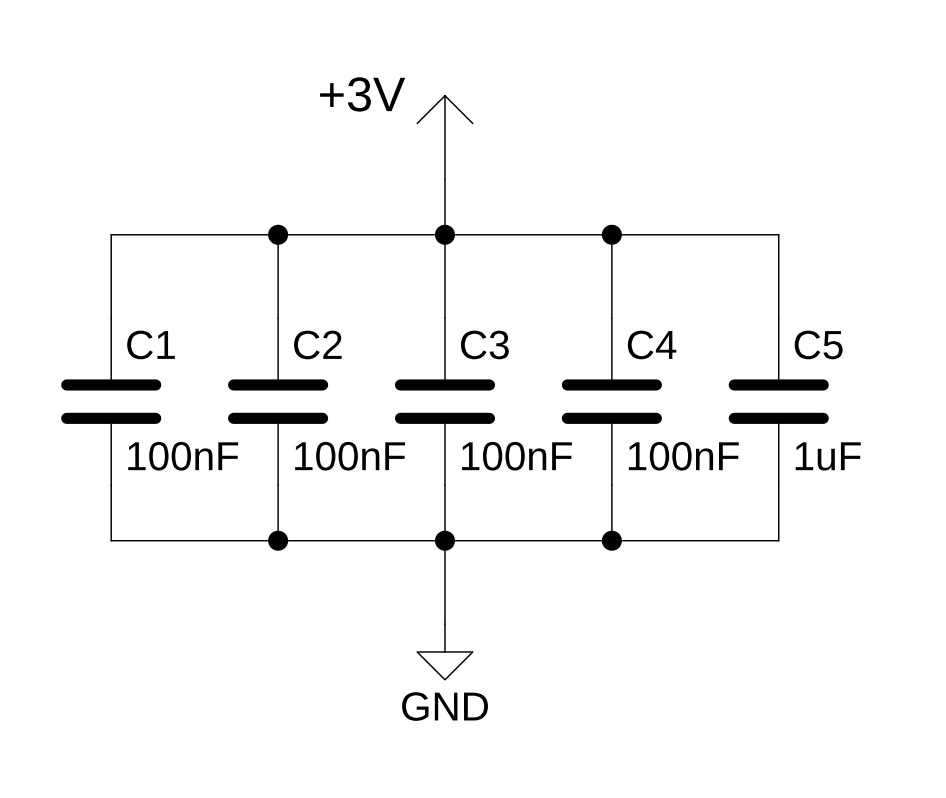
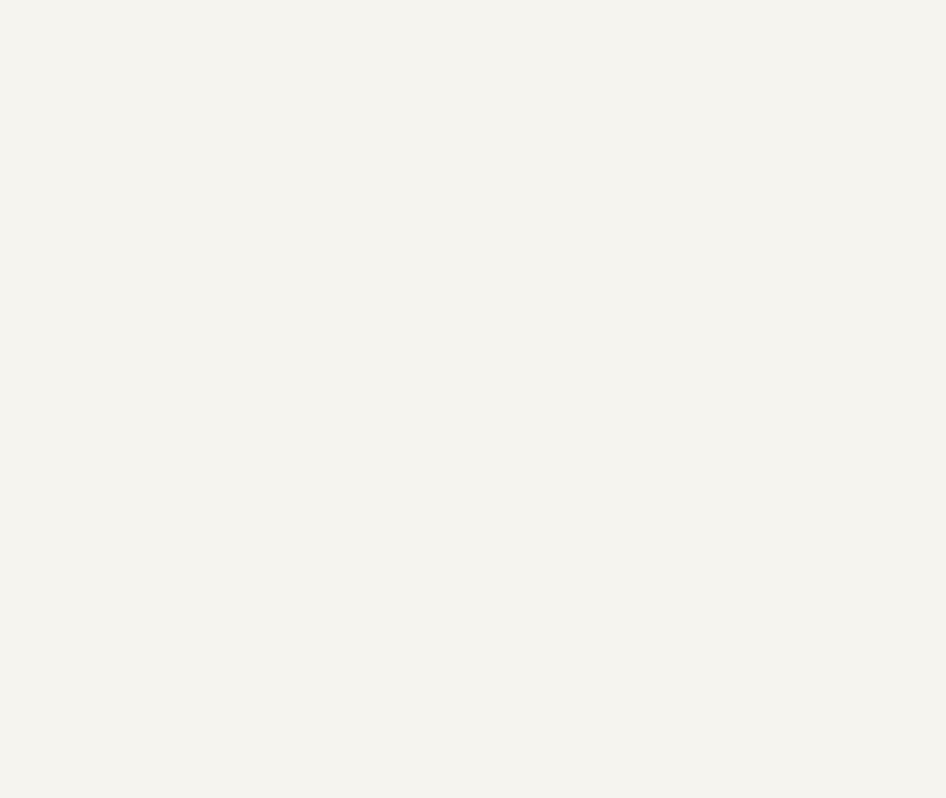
power symbol: +3V (444, 137) -> none
wire: (444, 179) (444, 318) -> none
wire: (278, 234) (278, 318) -> none
junction: (278, 234) -> none
junction: (444, 234) -> none
wire: (611, 234) (611, 318) -> none
junction: (611, 234) -> none
wire: (111, 318) (111, 234) (778, 234) (778, 318) -> none
C1: 100nF (111, 401) -> none
C2: 100nF (278, 401) -> none
C3: 100nF (444, 401) -> none
C4: 100nF (611, 401) -> none
C5: 1uF (778, 401) -> none
wire: (111, 485) (111, 540) (778, 540) (778, 485) -> none
wire: (278, 485) (278, 540) -> none
wire: (444, 485) (444, 624) -> none
wire: (611, 485) (611, 540) -> none
junction: (278, 540) -> none
junction: (444, 540) -> none
junction: (611, 540) -> none
power symbol: GND (444, 651) -> none

